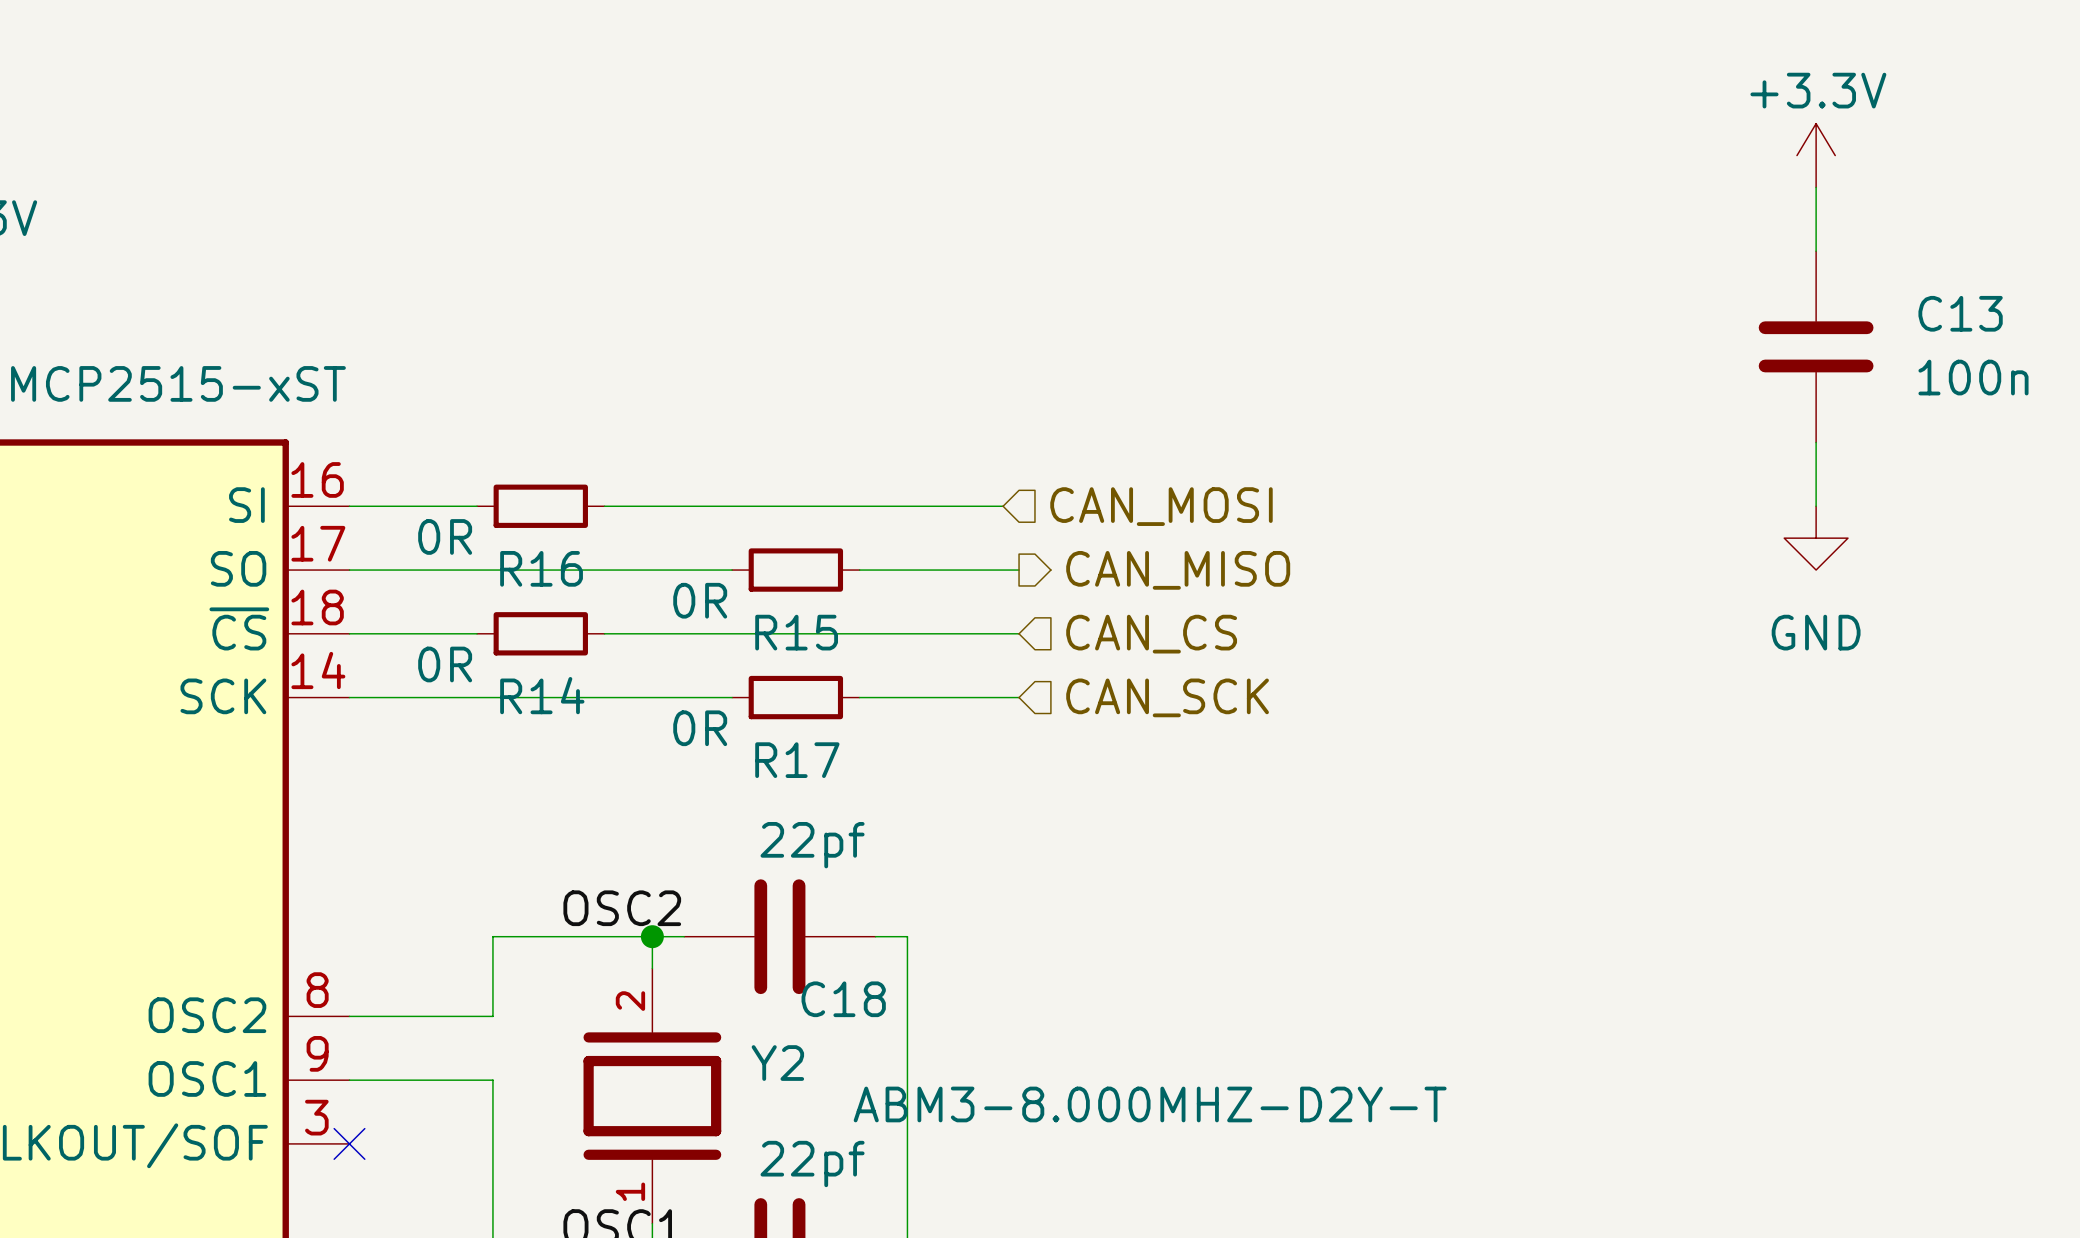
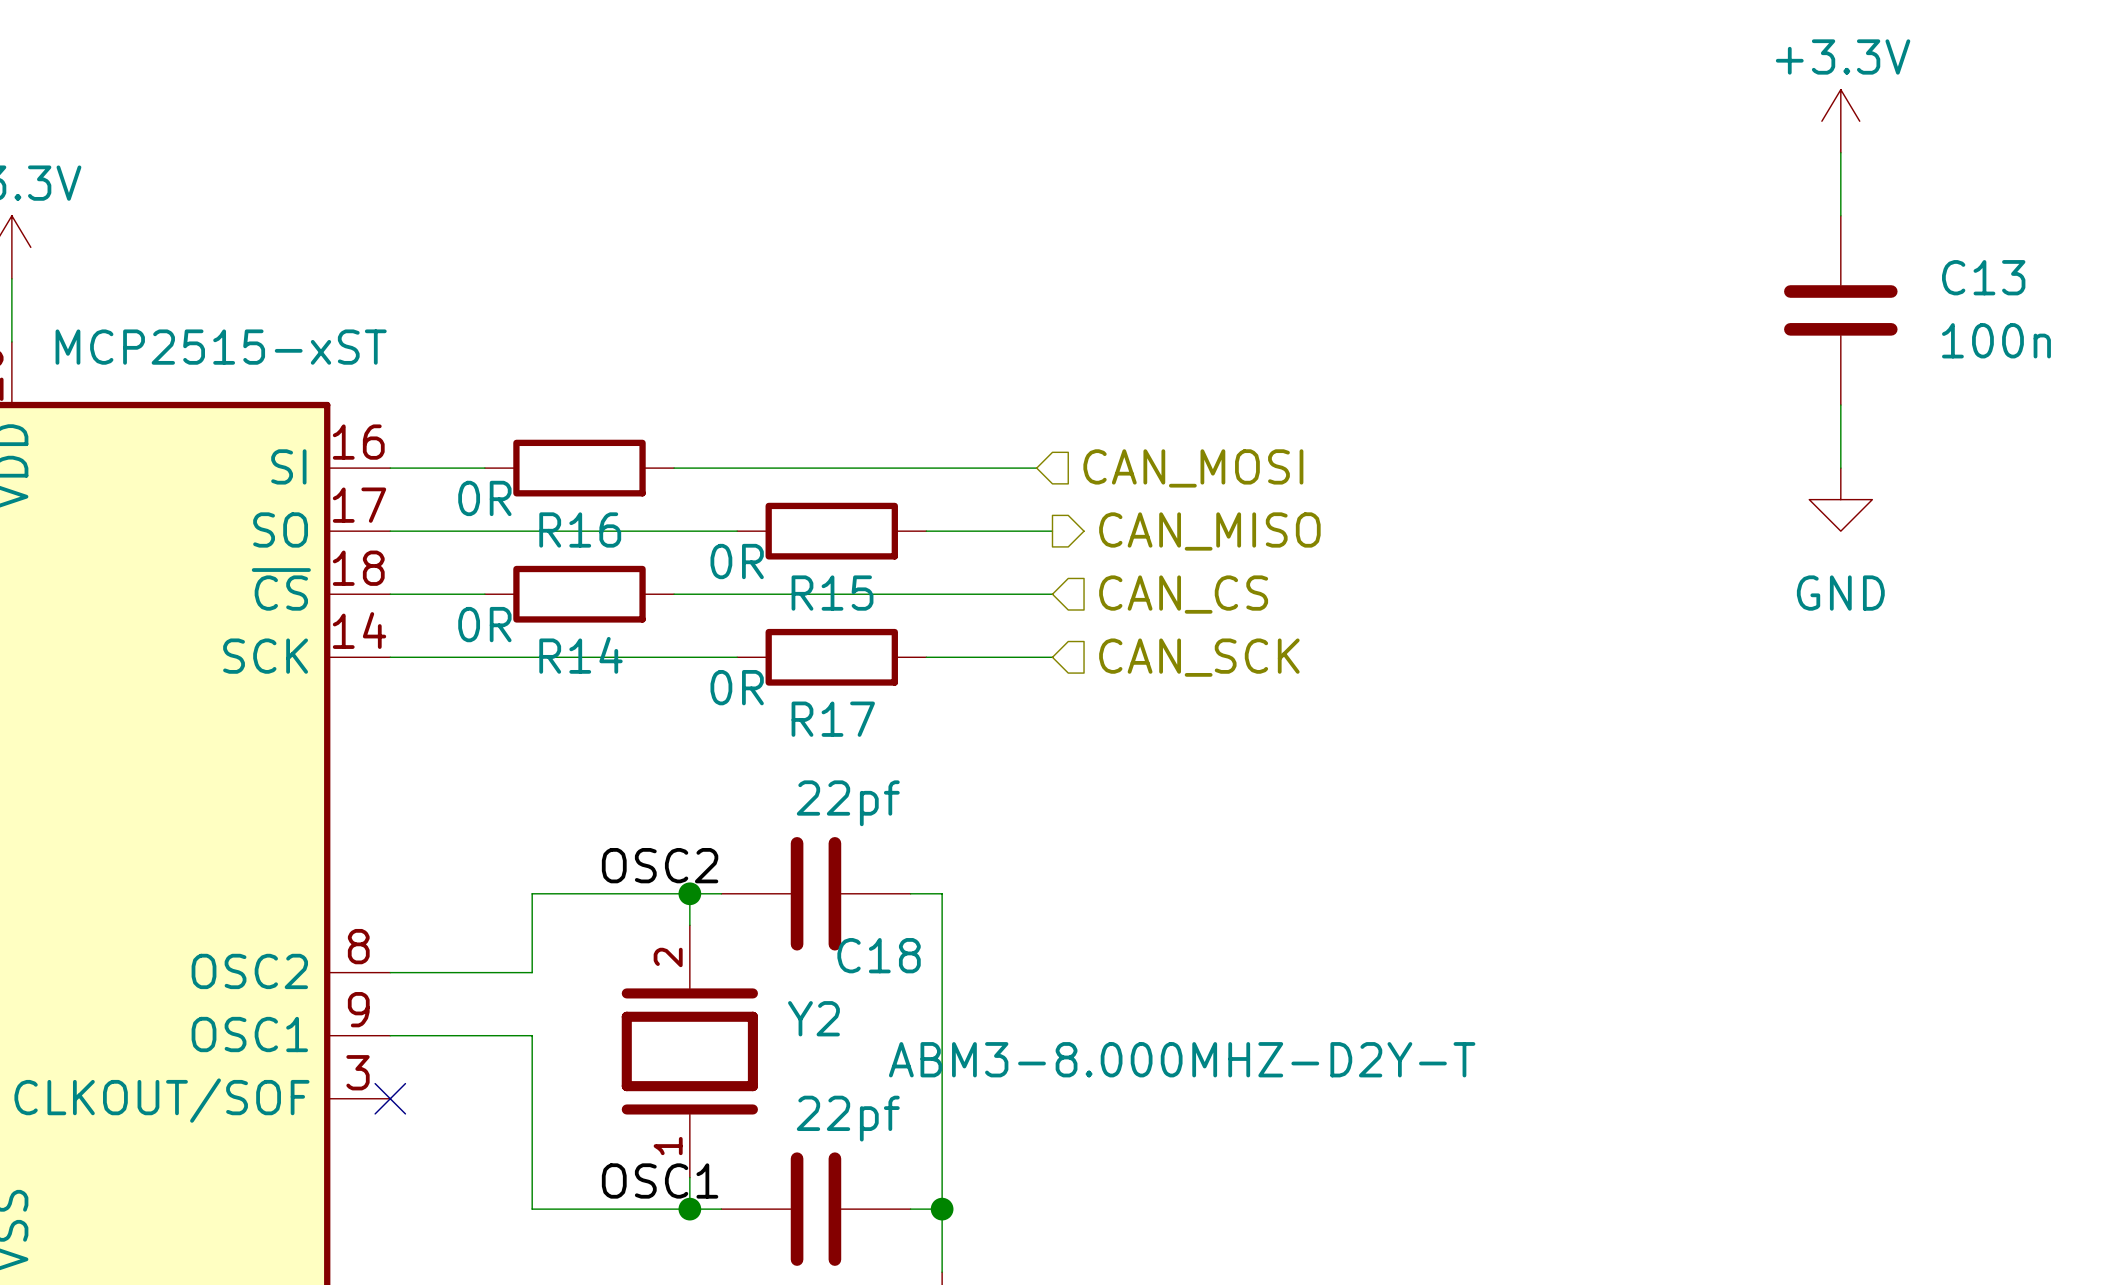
R16 symbol: [477, 484, 605, 528] -> [484, 439, 675, 497]
R15 symbol: [732, 548, 860, 592] -> [737, 502, 927, 560]
R14 symbol: [477, 612, 605, 656] -> [484, 565, 675, 623]
R17 symbol: [732, 675, 860, 720] -> [737, 628, 927, 686]

